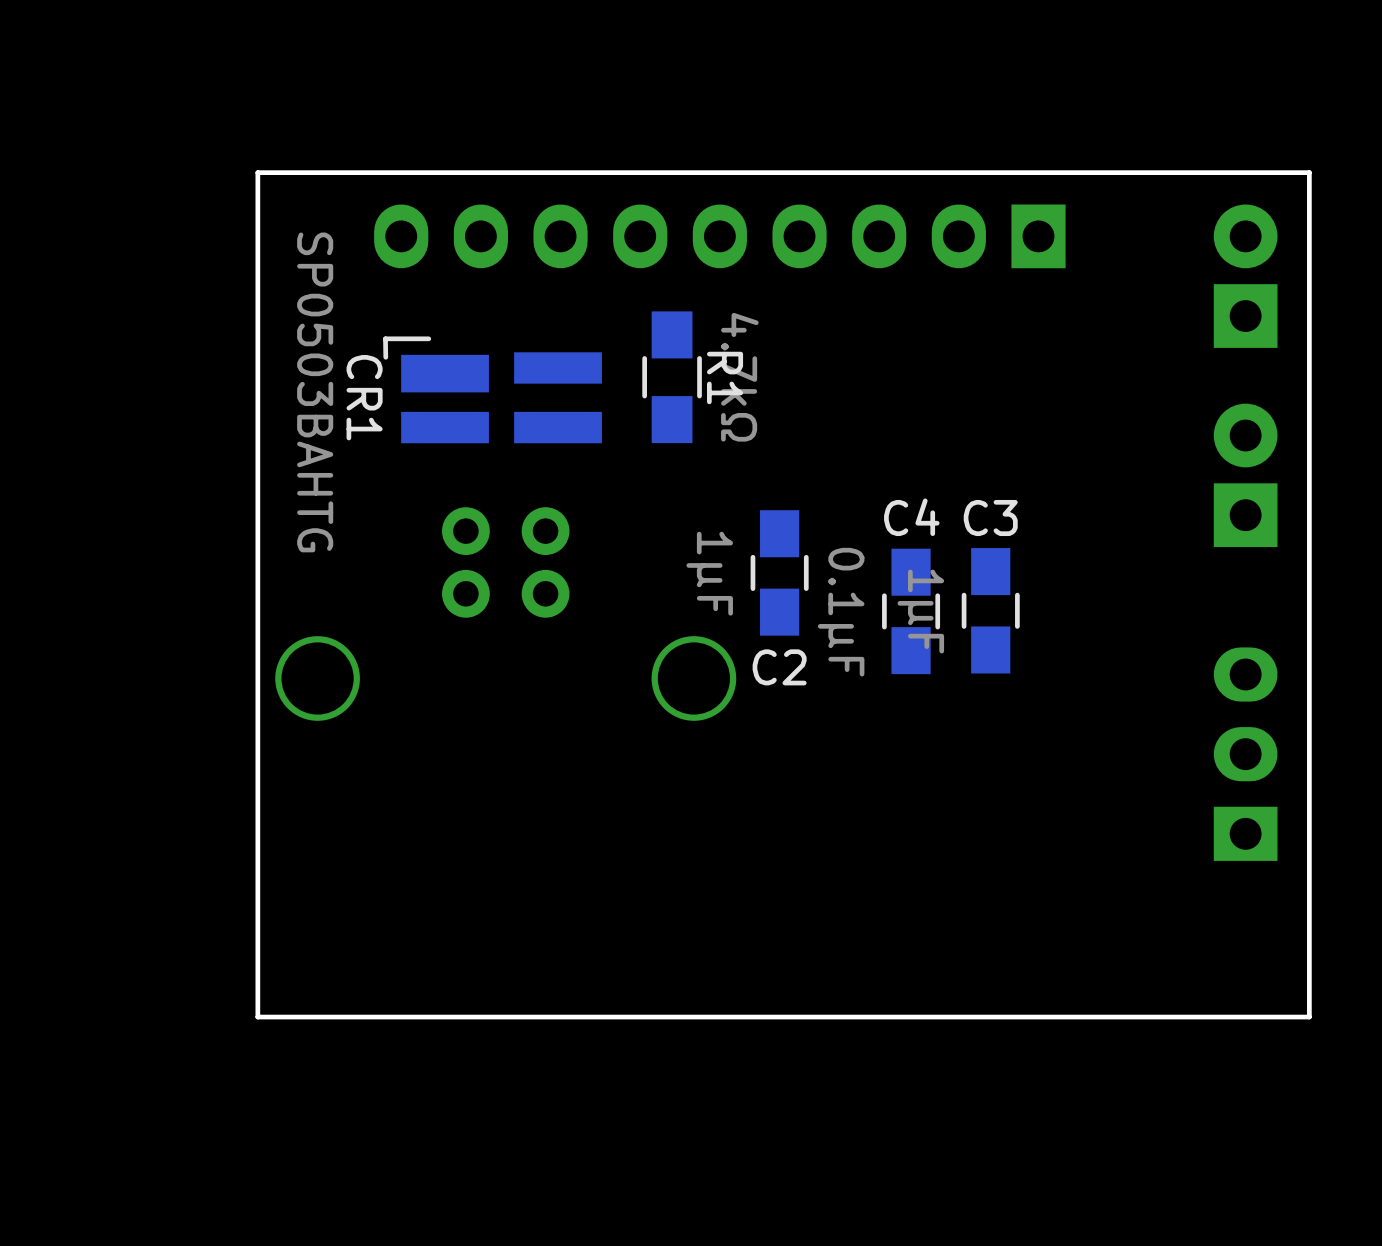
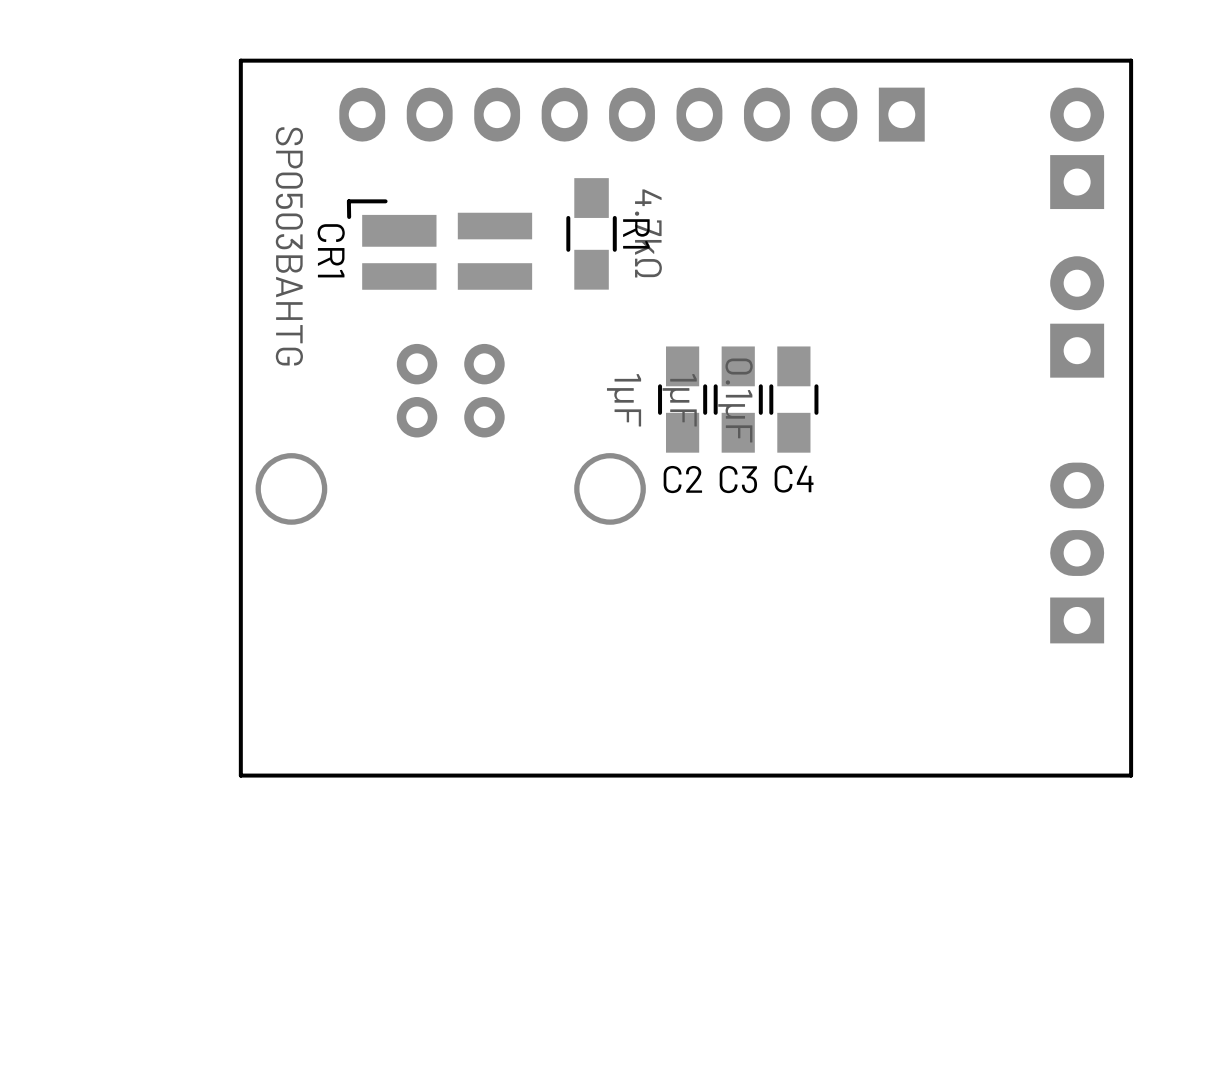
C4 name position: C4 (911, 517) -> C4 (794, 479)
C3 name position: C3 (990, 517) -> C3 (738, 479)
C3 position: (990, 610) -> (738, 399)
C4 position: (911, 611) -> (793, 399)

